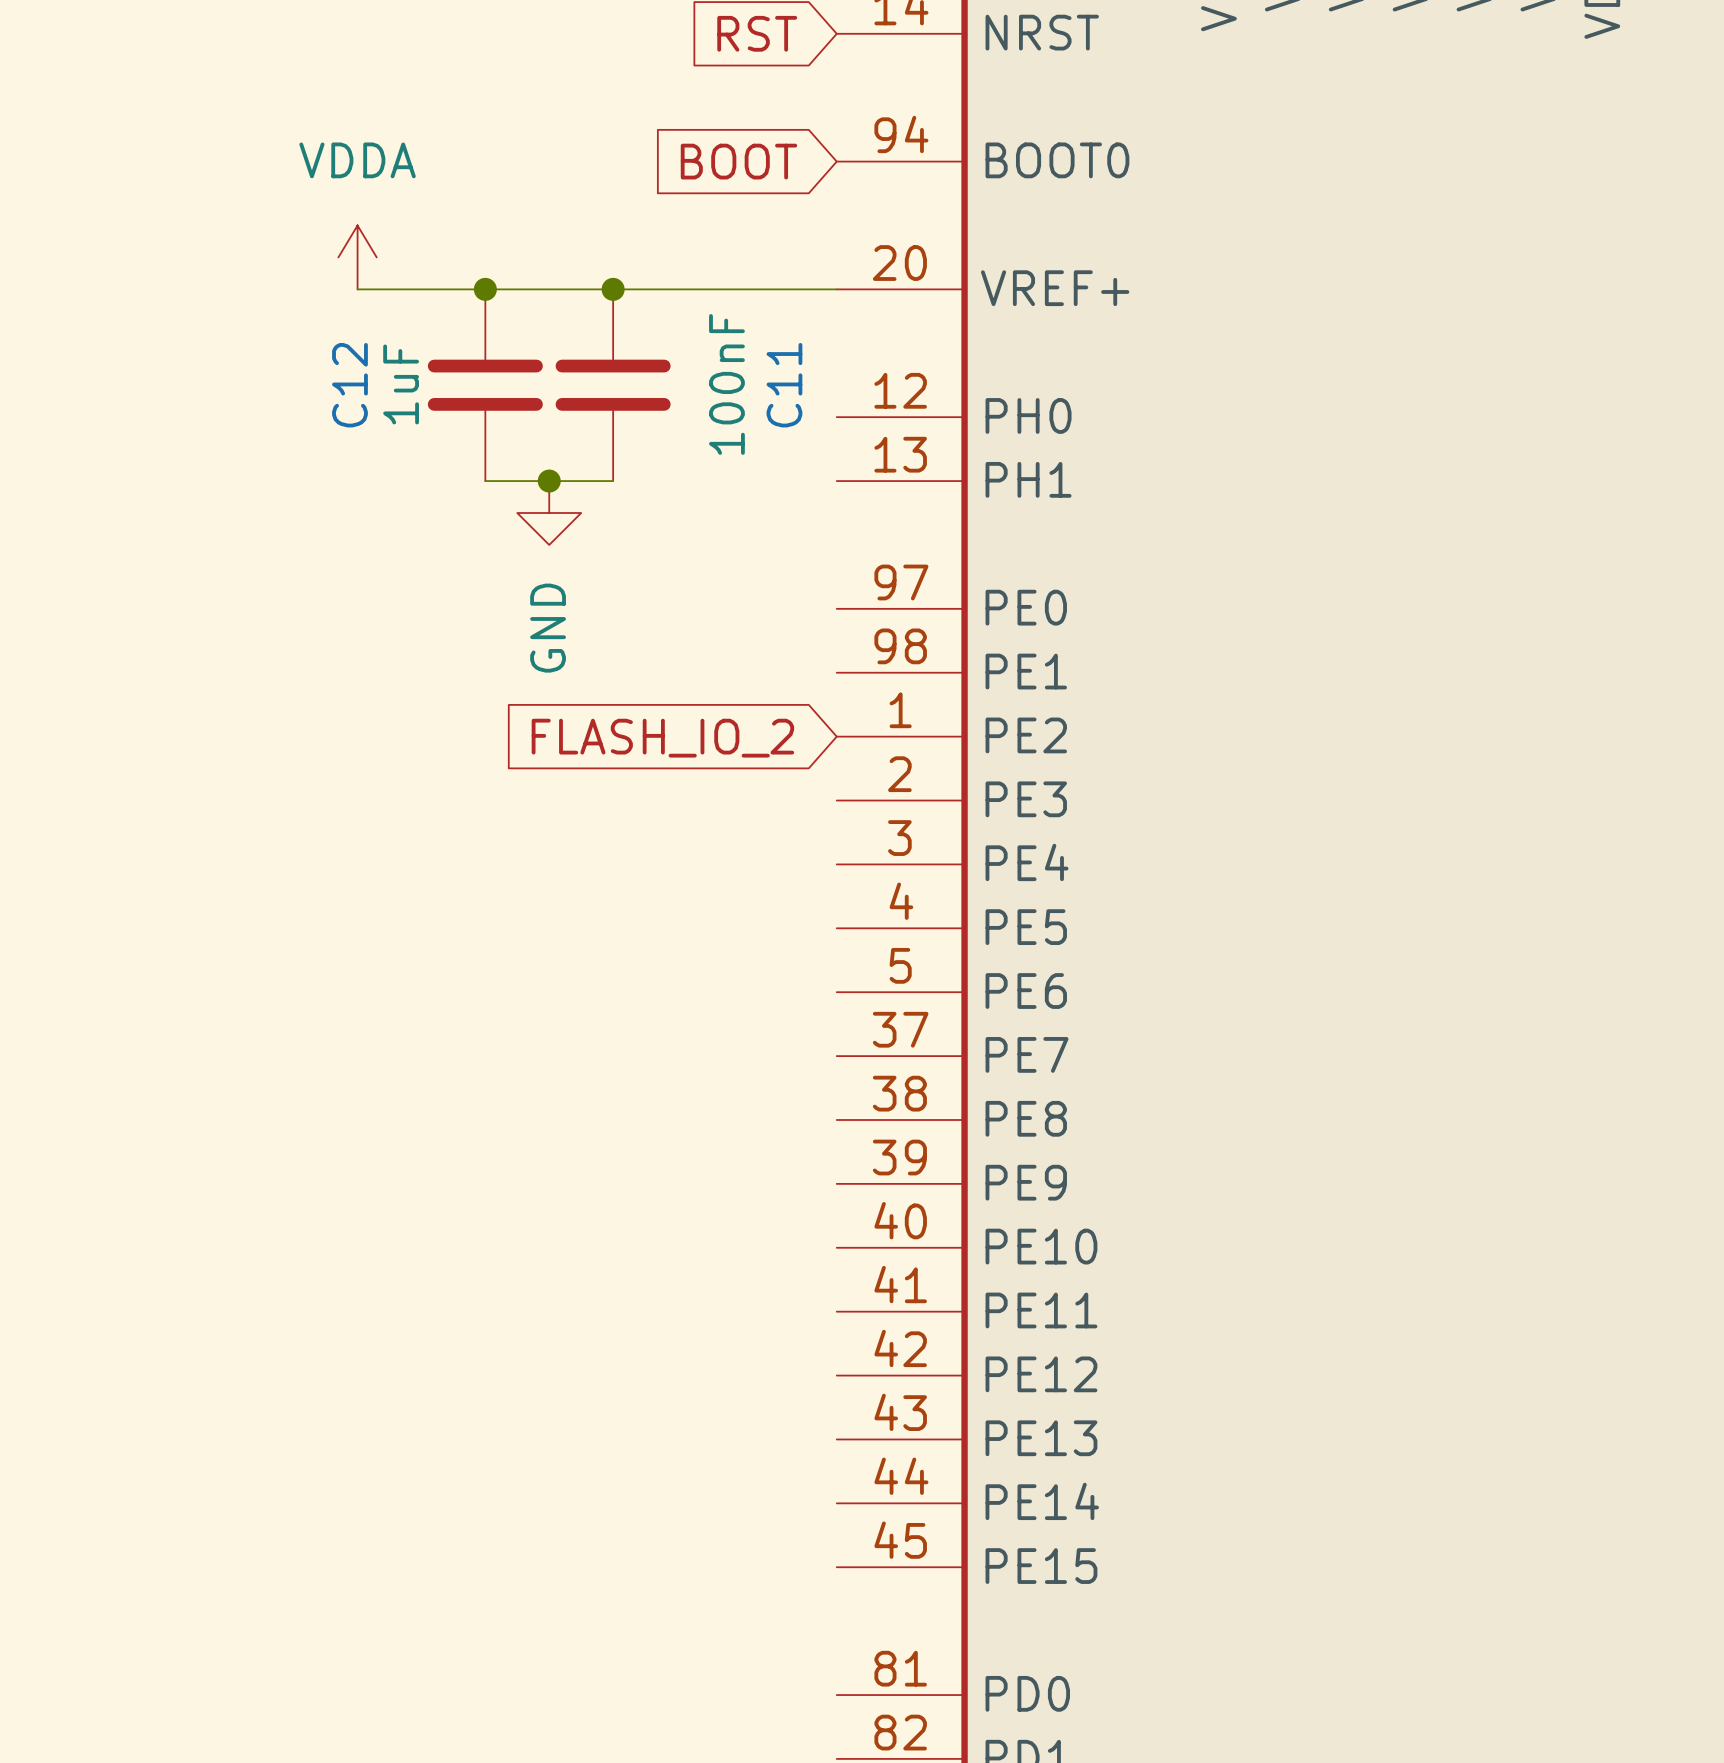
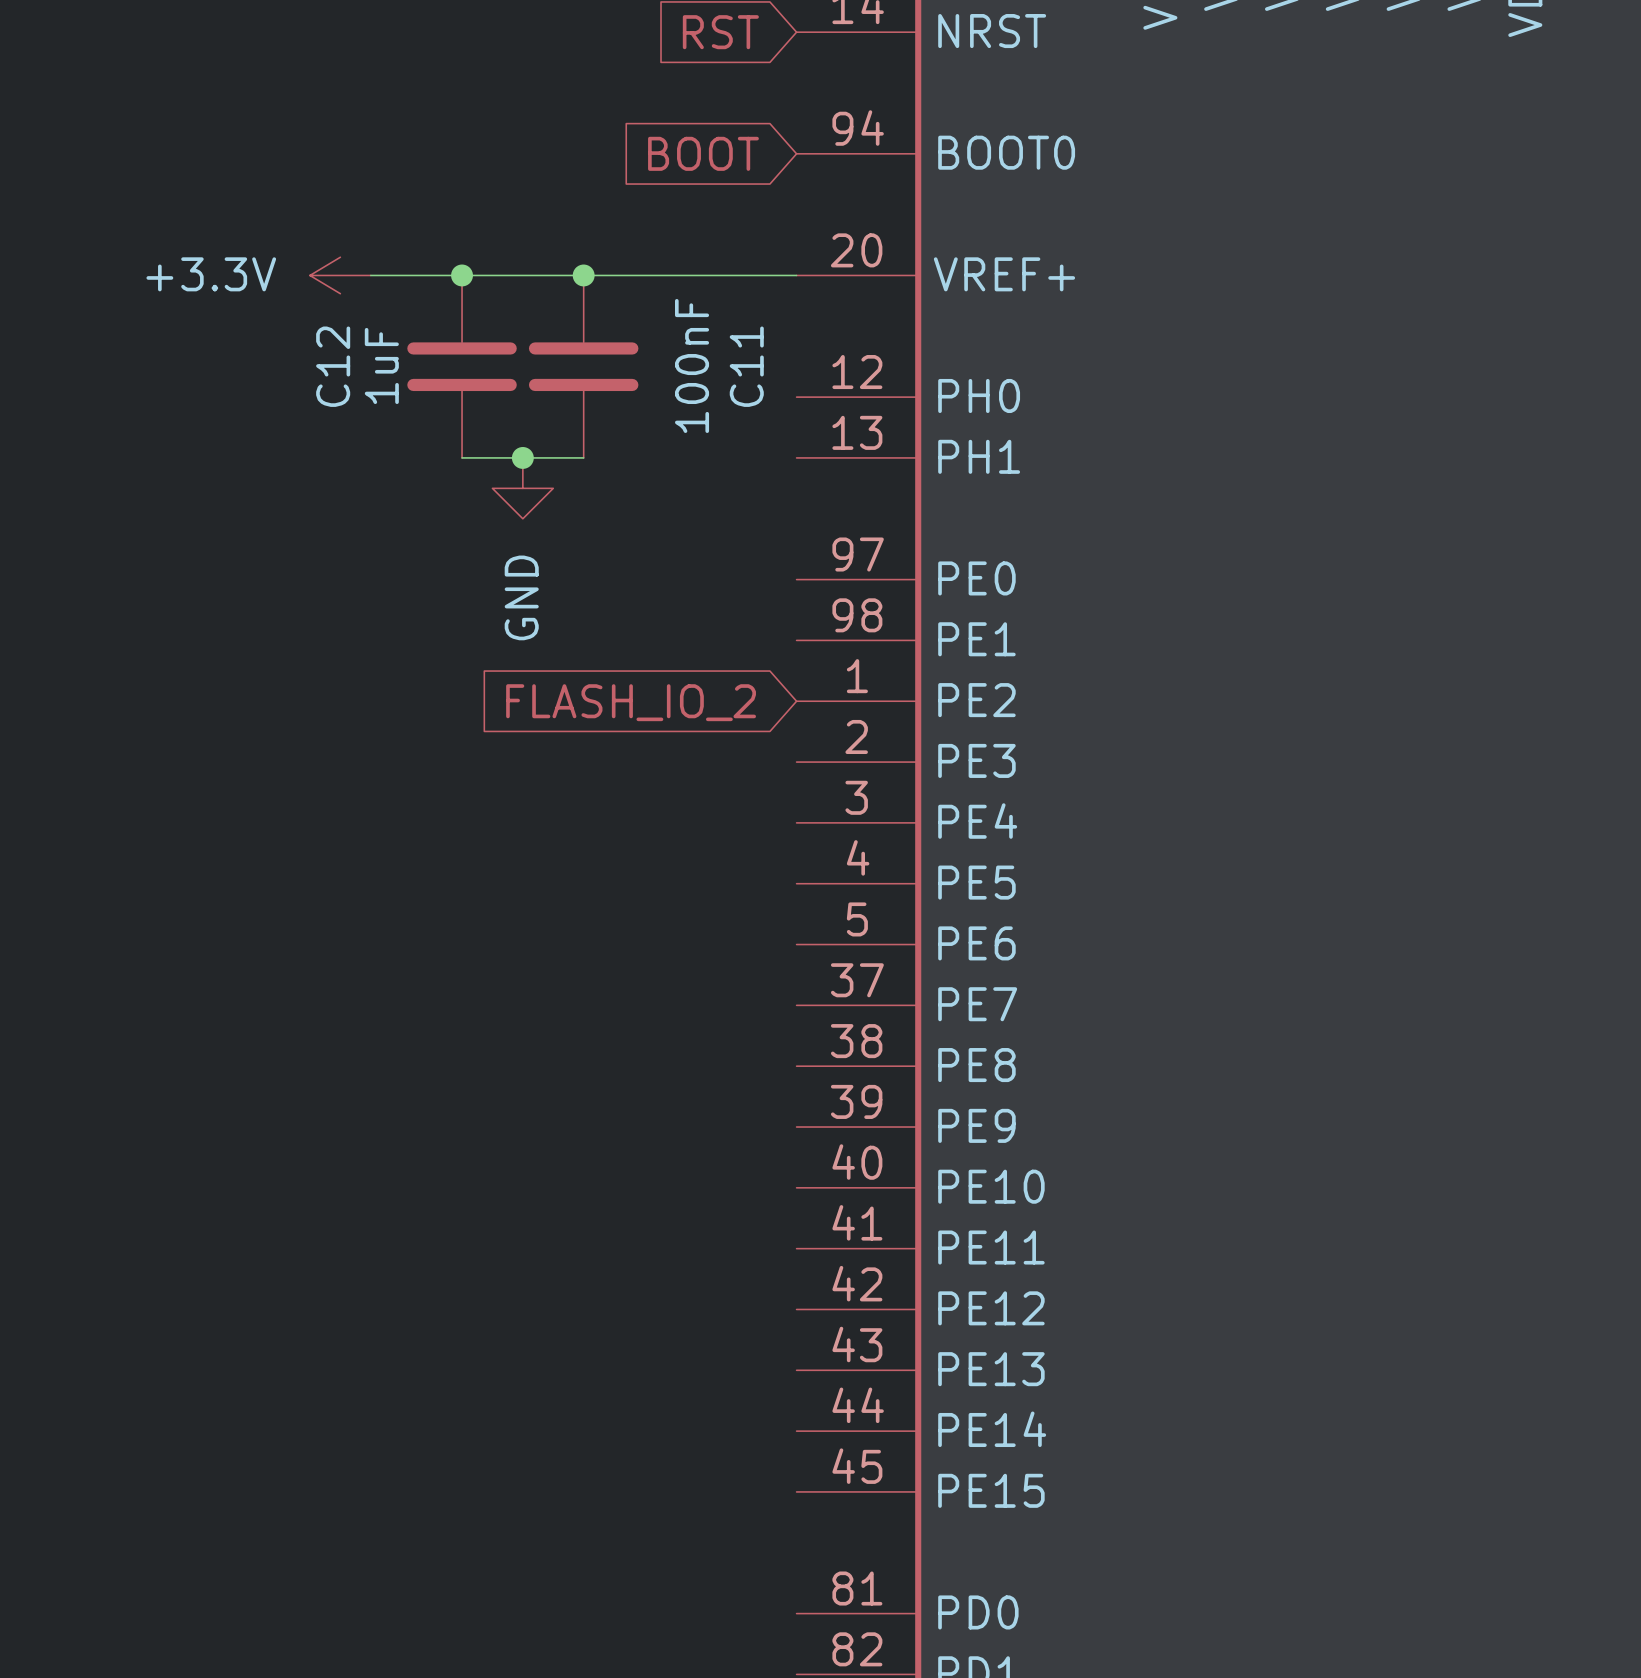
power symbol: VDDA (357, 257) -> none
power symbol: none -> +3.3V (340, 275)

